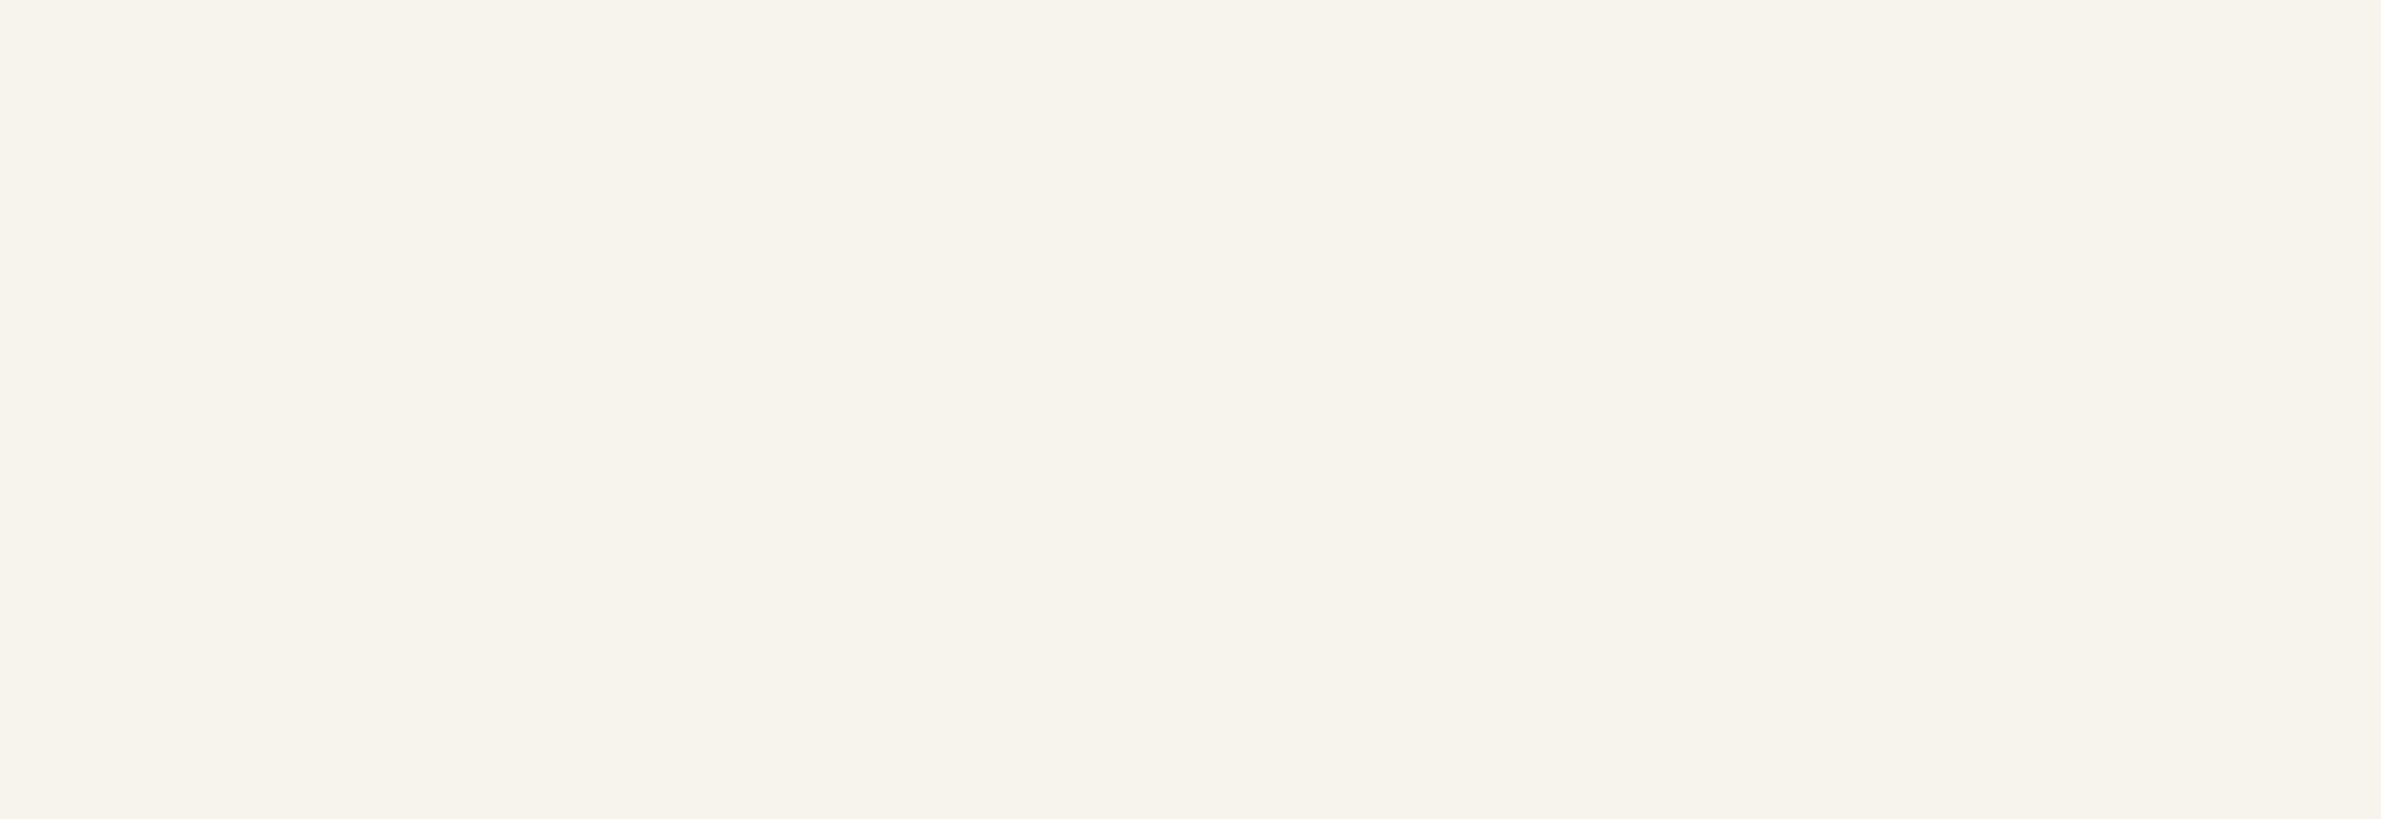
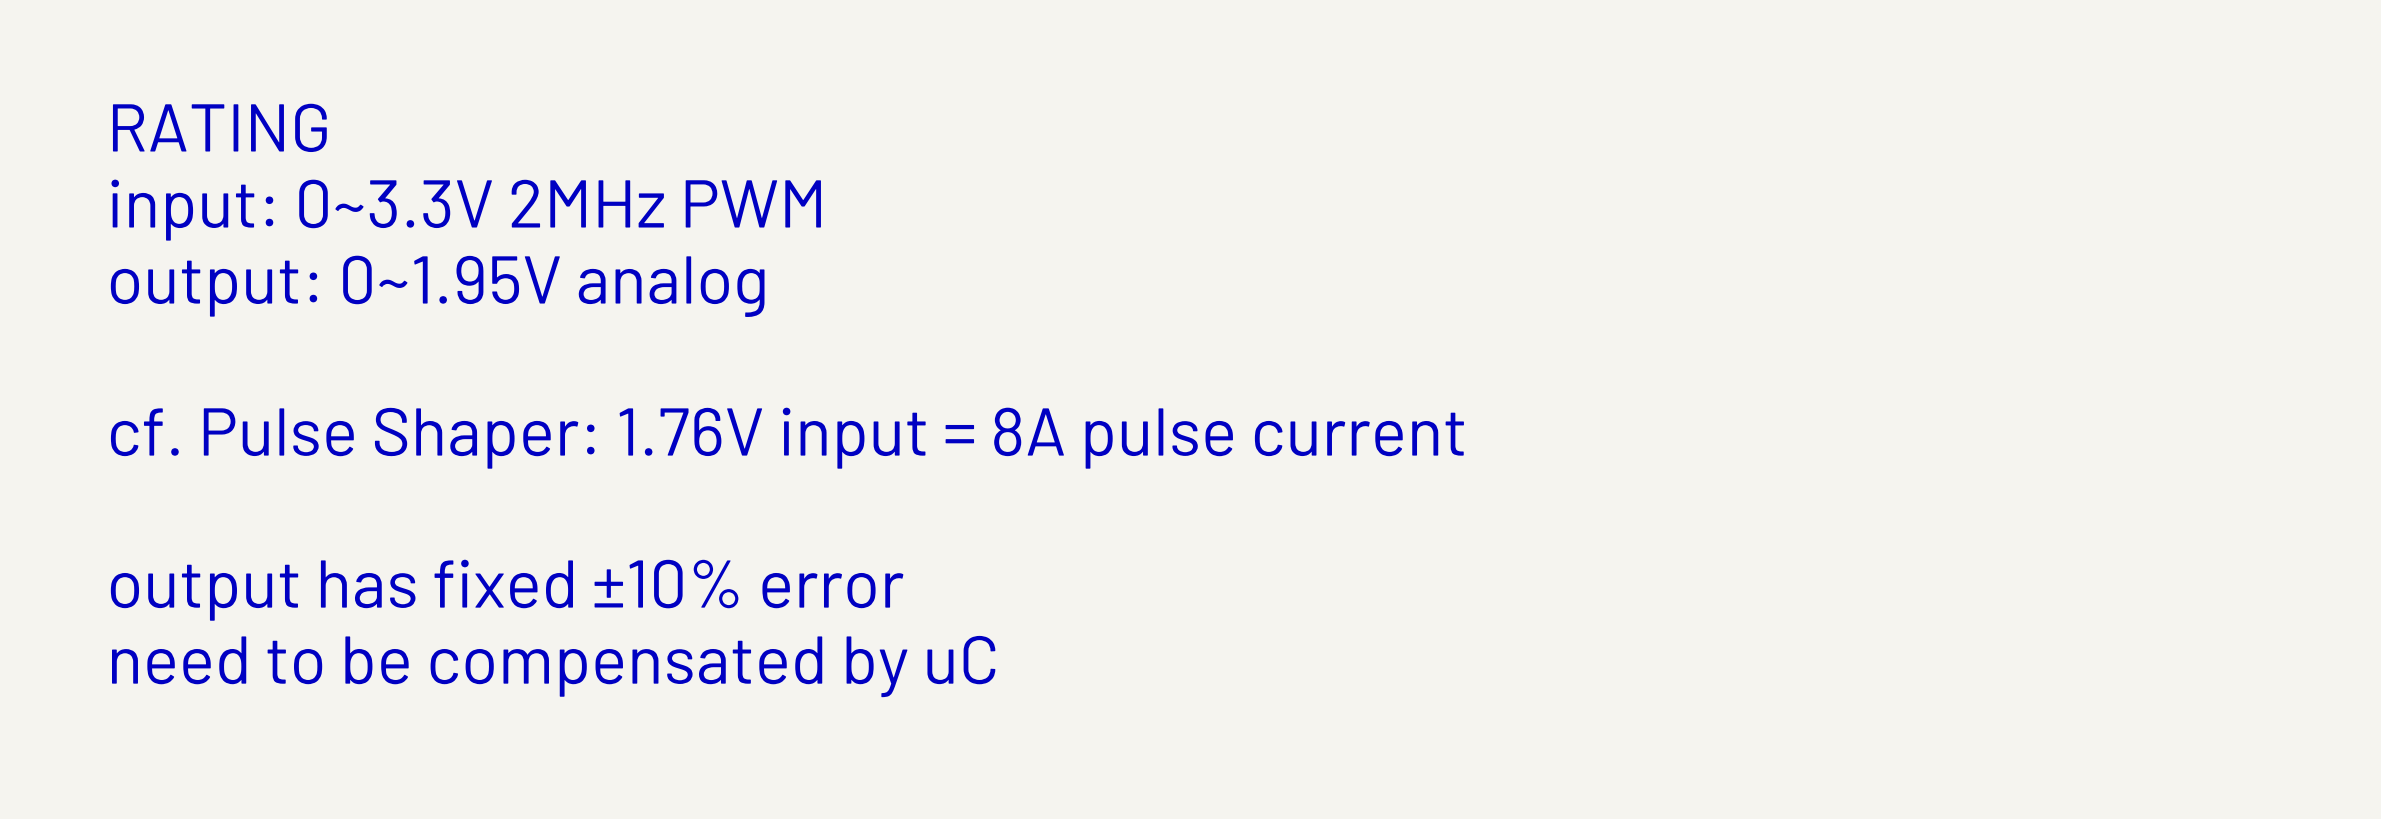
text: none -> RATING (219, 127)
text: none -> input: 0~3.3V 2MHz PWM (466, 210)
text: none -> output: 0~1.95V analog (437, 286)
text: none -> cf. Pulse Shaper: 1.76V input = 8A pulse current (787, 438)
text: none -> output has fixed ±10% error (507, 590)
text: none -> need to be compensated by uC (553, 666)

